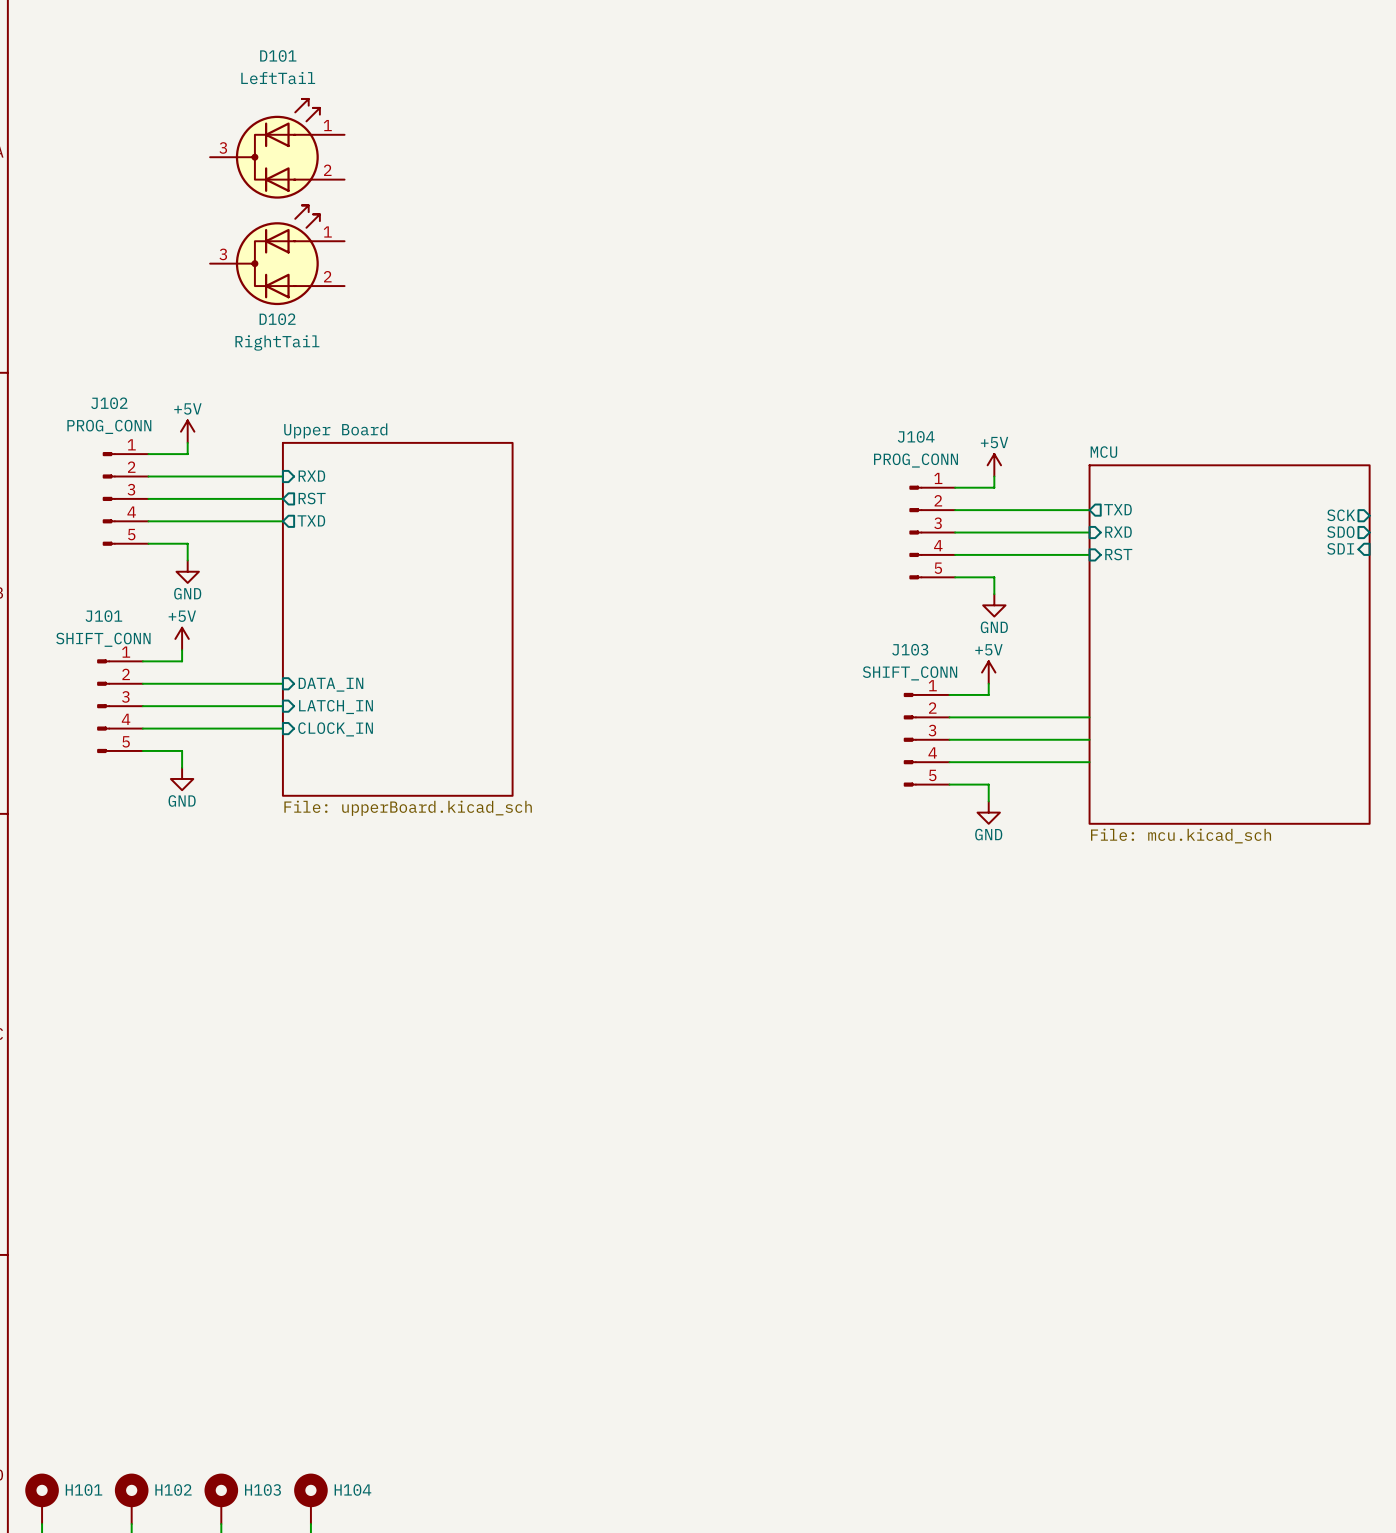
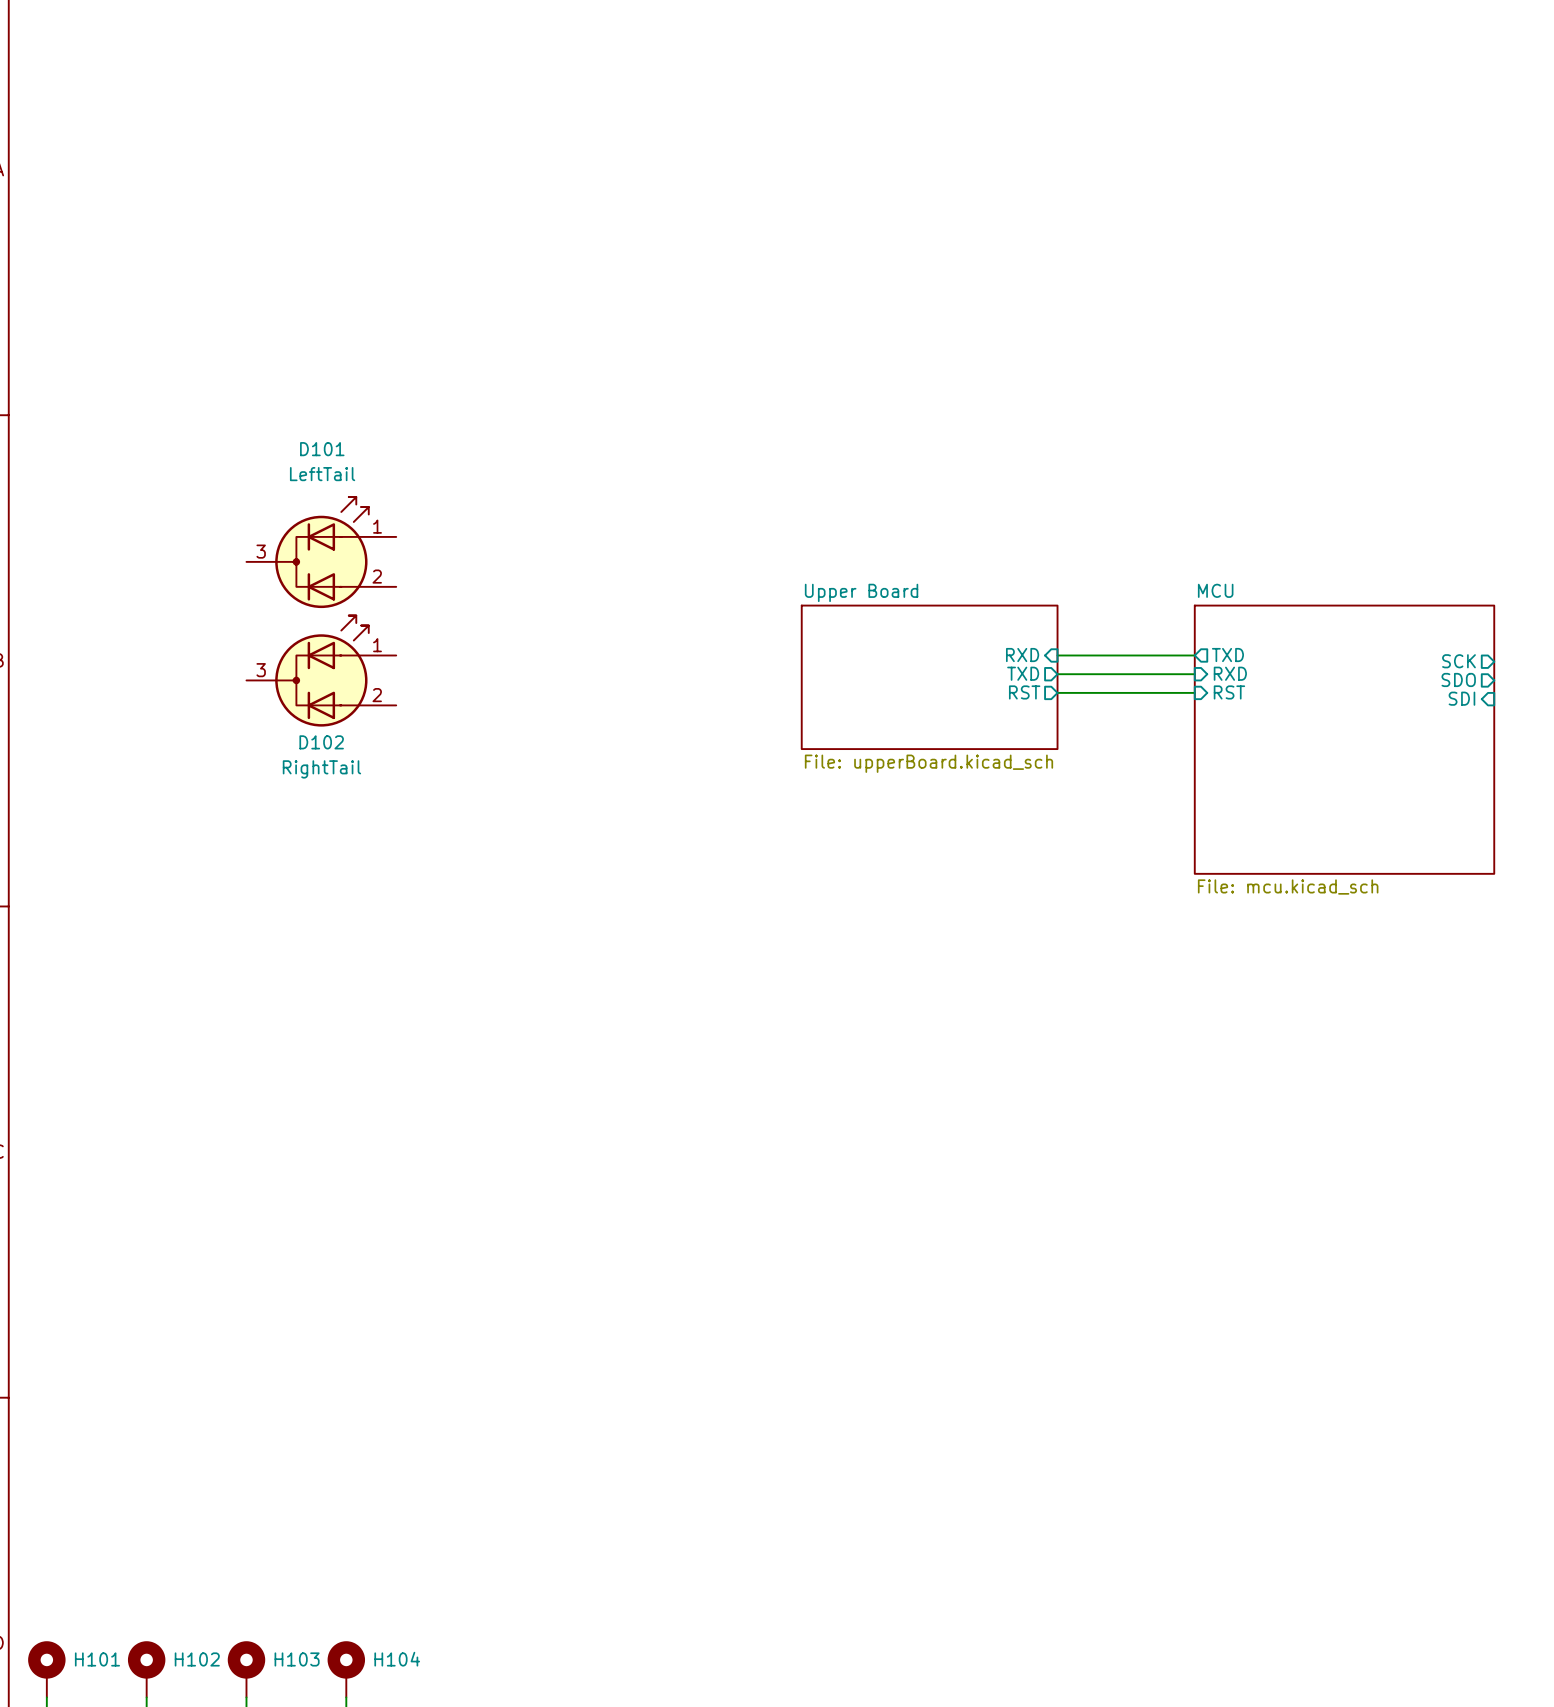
D101 position: (277, 148) -> (321, 552)
D102 position: (277, 255) -> (321, 671)
power symbol: +5V (187, 431) -> none
wire: (187, 442) (187, 454) (148, 454) -> none
power symbol: +5V (994, 465) -> none
wire: (148, 476) (282, 476) -> none
sheet pin: RXD (311, 476) -> none
wire: (994, 476) (994, 487) (955, 487) -> none
J102: PROG_CONN (125, 498) -> none
wire: (148, 498) (282, 498) -> none
sheet pin: RST (312, 498) -> none
sheet pin position: TXD (1117, 509) -> TXD (1227, 655)
wire: (955, 510) (1089, 510) -> none
sheet pin position: SCK (1341, 515) -> SCK (1458, 661)
sheet pin: TXD (311, 520) -> none
wire: (148, 521) (282, 521) -> none
J104: PROG_CONN (932, 532) -> none
wire: (955, 532) (1089, 532) -> none
sheet pin position: RXD (1118, 532) -> RXD (1230, 673)
sheet pin position: SDO (1340, 532) -> SDO (1458, 679)
wire: (148, 543) (187, 543) (187, 560) -> none
sheet pin position: SDI (1340, 548) -> SDI (1461, 698)
wire: (955, 554) (1089, 554) -> none
sheet pin position: RST (1118, 554) -> RST (1229, 692)
power symbol: GND (187, 571) -> none
wire: (955, 577) (994, 577) (994, 594) -> none
sheet pin: none -> RXD (1022, 655)
wire: none -> (1057, 655) (1194, 655)
sheet pin: none -> TXD (1023, 673)
wire: none -> (1057, 674) (1194, 674)
power symbol: GND (994, 605) -> none
sheet Upper Board: none -> File: upperBoard.kicad_sch (929, 677)
sheet Upper Board: File: upperBoard.kicad_sch (397, 619) -> none
sheet pin: none -> RST (1024, 692)
wire: none -> (1057, 692) (1194, 692)
power symbol: +5V (182, 638) -> none
sheet MCU: File: mcu.kicad_sch (1229, 644) -> none
wire: (182, 650) (182, 661) (142, 661) -> none
sheet MCU: none -> File: mcu.kicad_sch (1344, 739)
power symbol: +5V (988, 672) -> none
wire: (142, 683) (282, 683) -> none
wire: (988, 683) (988, 694) (949, 694) -> none
sheet pin: DATA_IN (330, 684) -> none
J101: SHIFT_CONN (120, 706) -> none
wire: (142, 706) (282, 706) -> none
sheet pin: LATCH_IN (336, 707) -> none
wire: (949, 717) (1089, 717) -> none
wire: (142, 728) (282, 728) -> none
sheet pin: CLOCK_IN (335, 729) -> none
J103: SHIFT_CONN (926, 739) -> none
wire: (949, 739) (1089, 739) -> none
wire: (142, 750) (182, 750) (182, 767) -> none
wire: (949, 762) (1089, 762) -> none
power symbol: GND (182, 778) -> none
wire: (949, 784) (988, 784) (988, 801) -> none
power symbol: GND (988, 812) -> none

